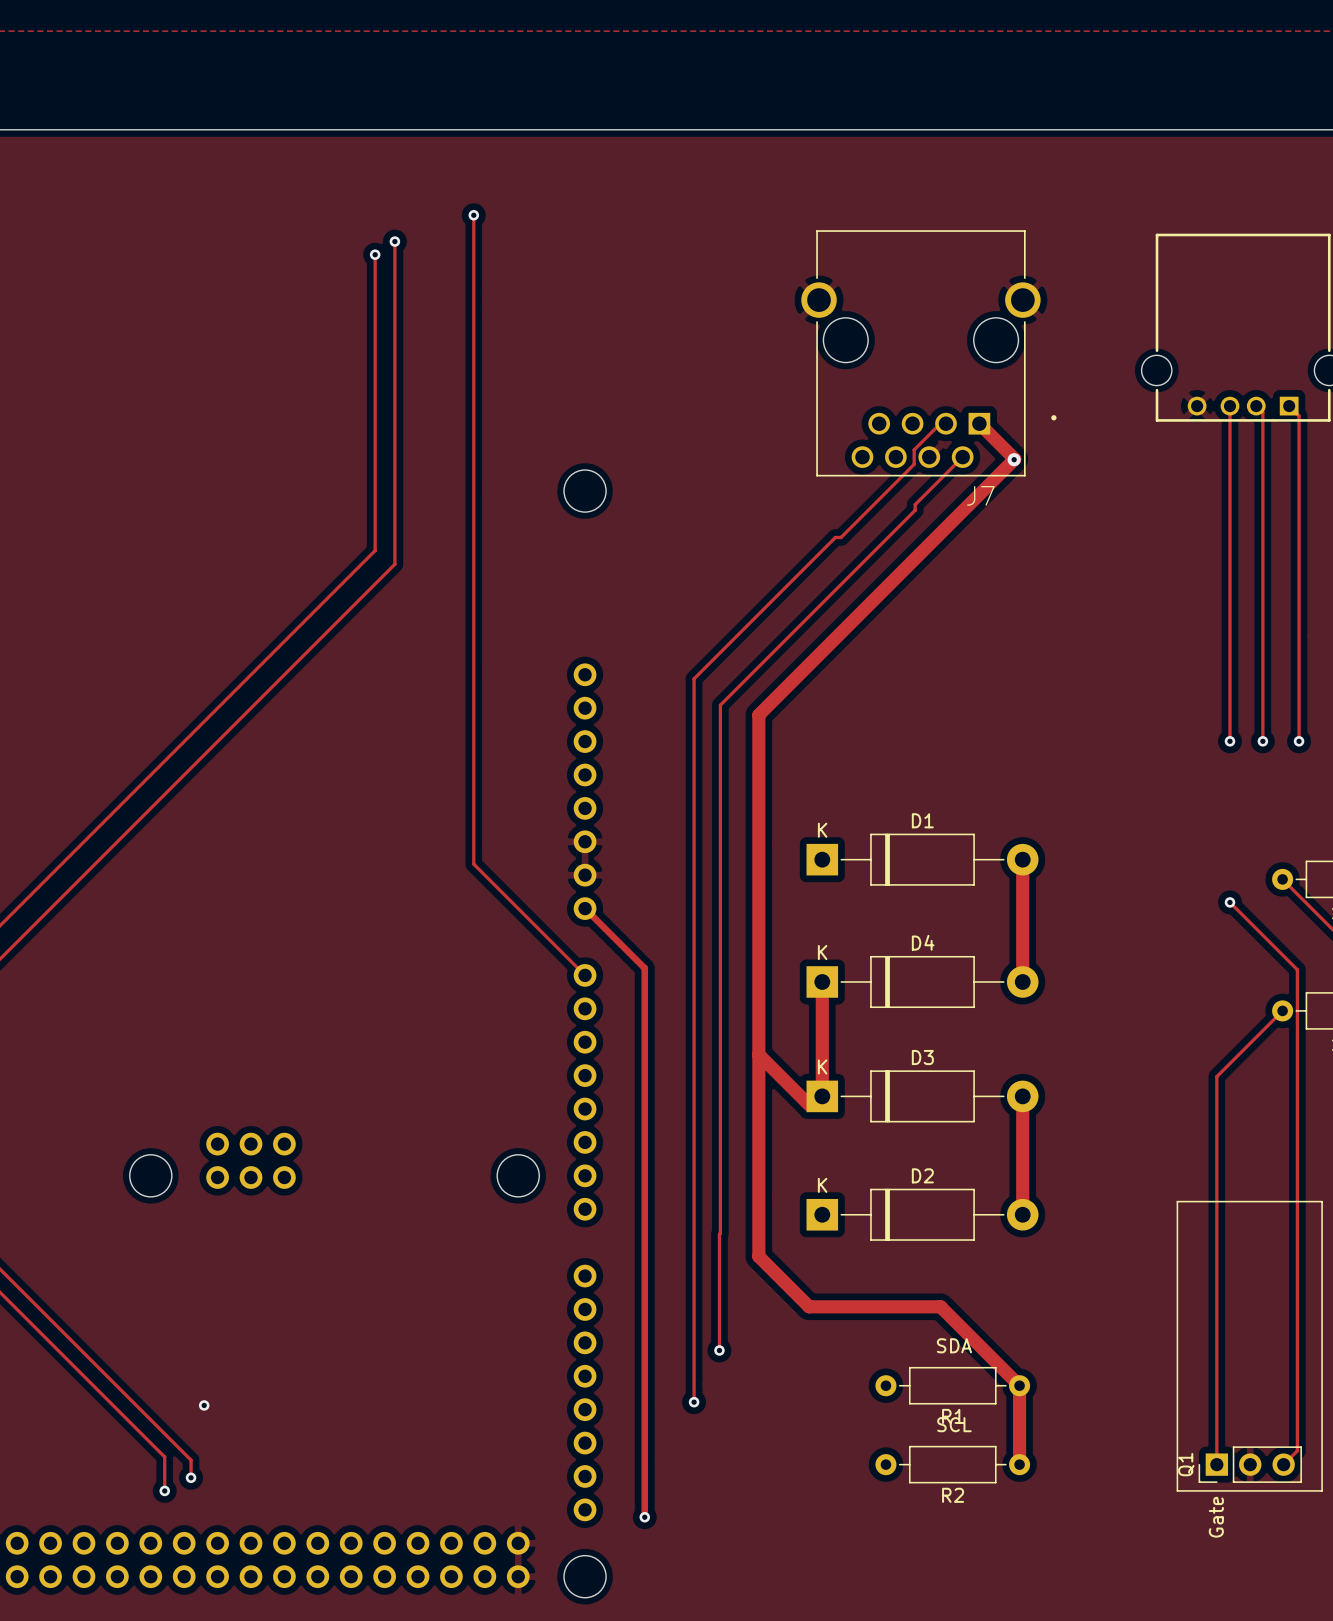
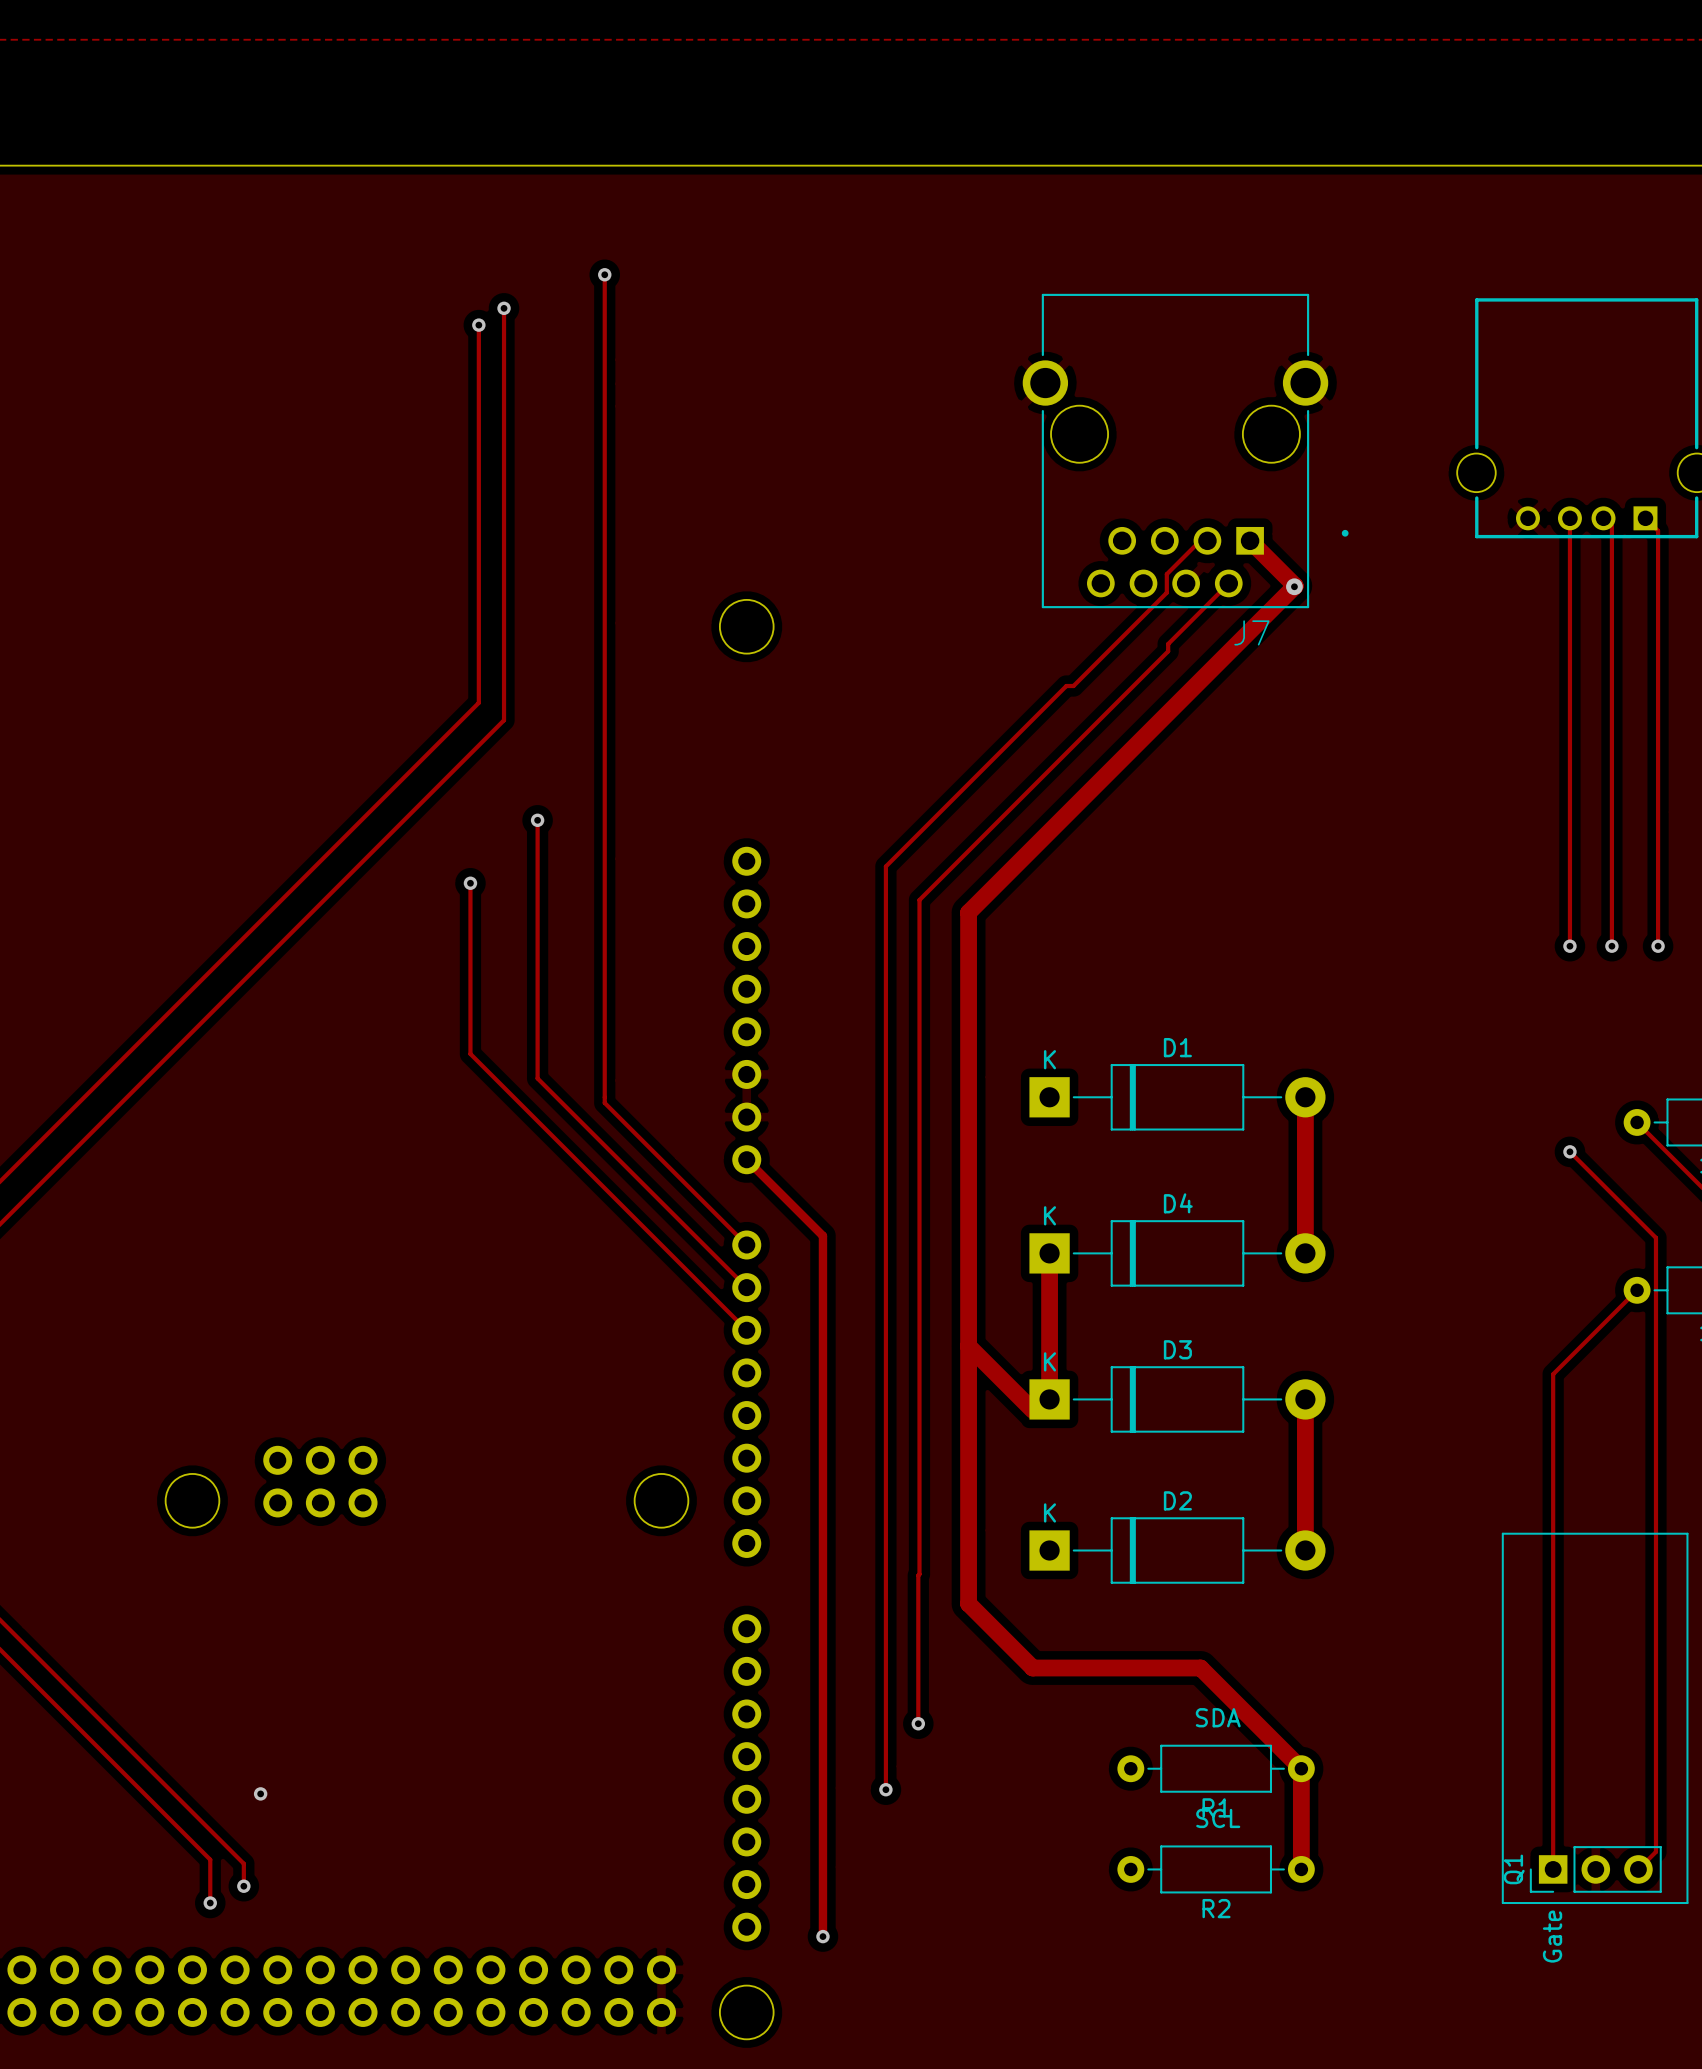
track: none -> (537, 820) (537, 1078) (746, 1287)
via: none -> (537, 820)
track: none -> (470, 883) (470, 1053) (746, 1330)
via: none -> (470, 883)

